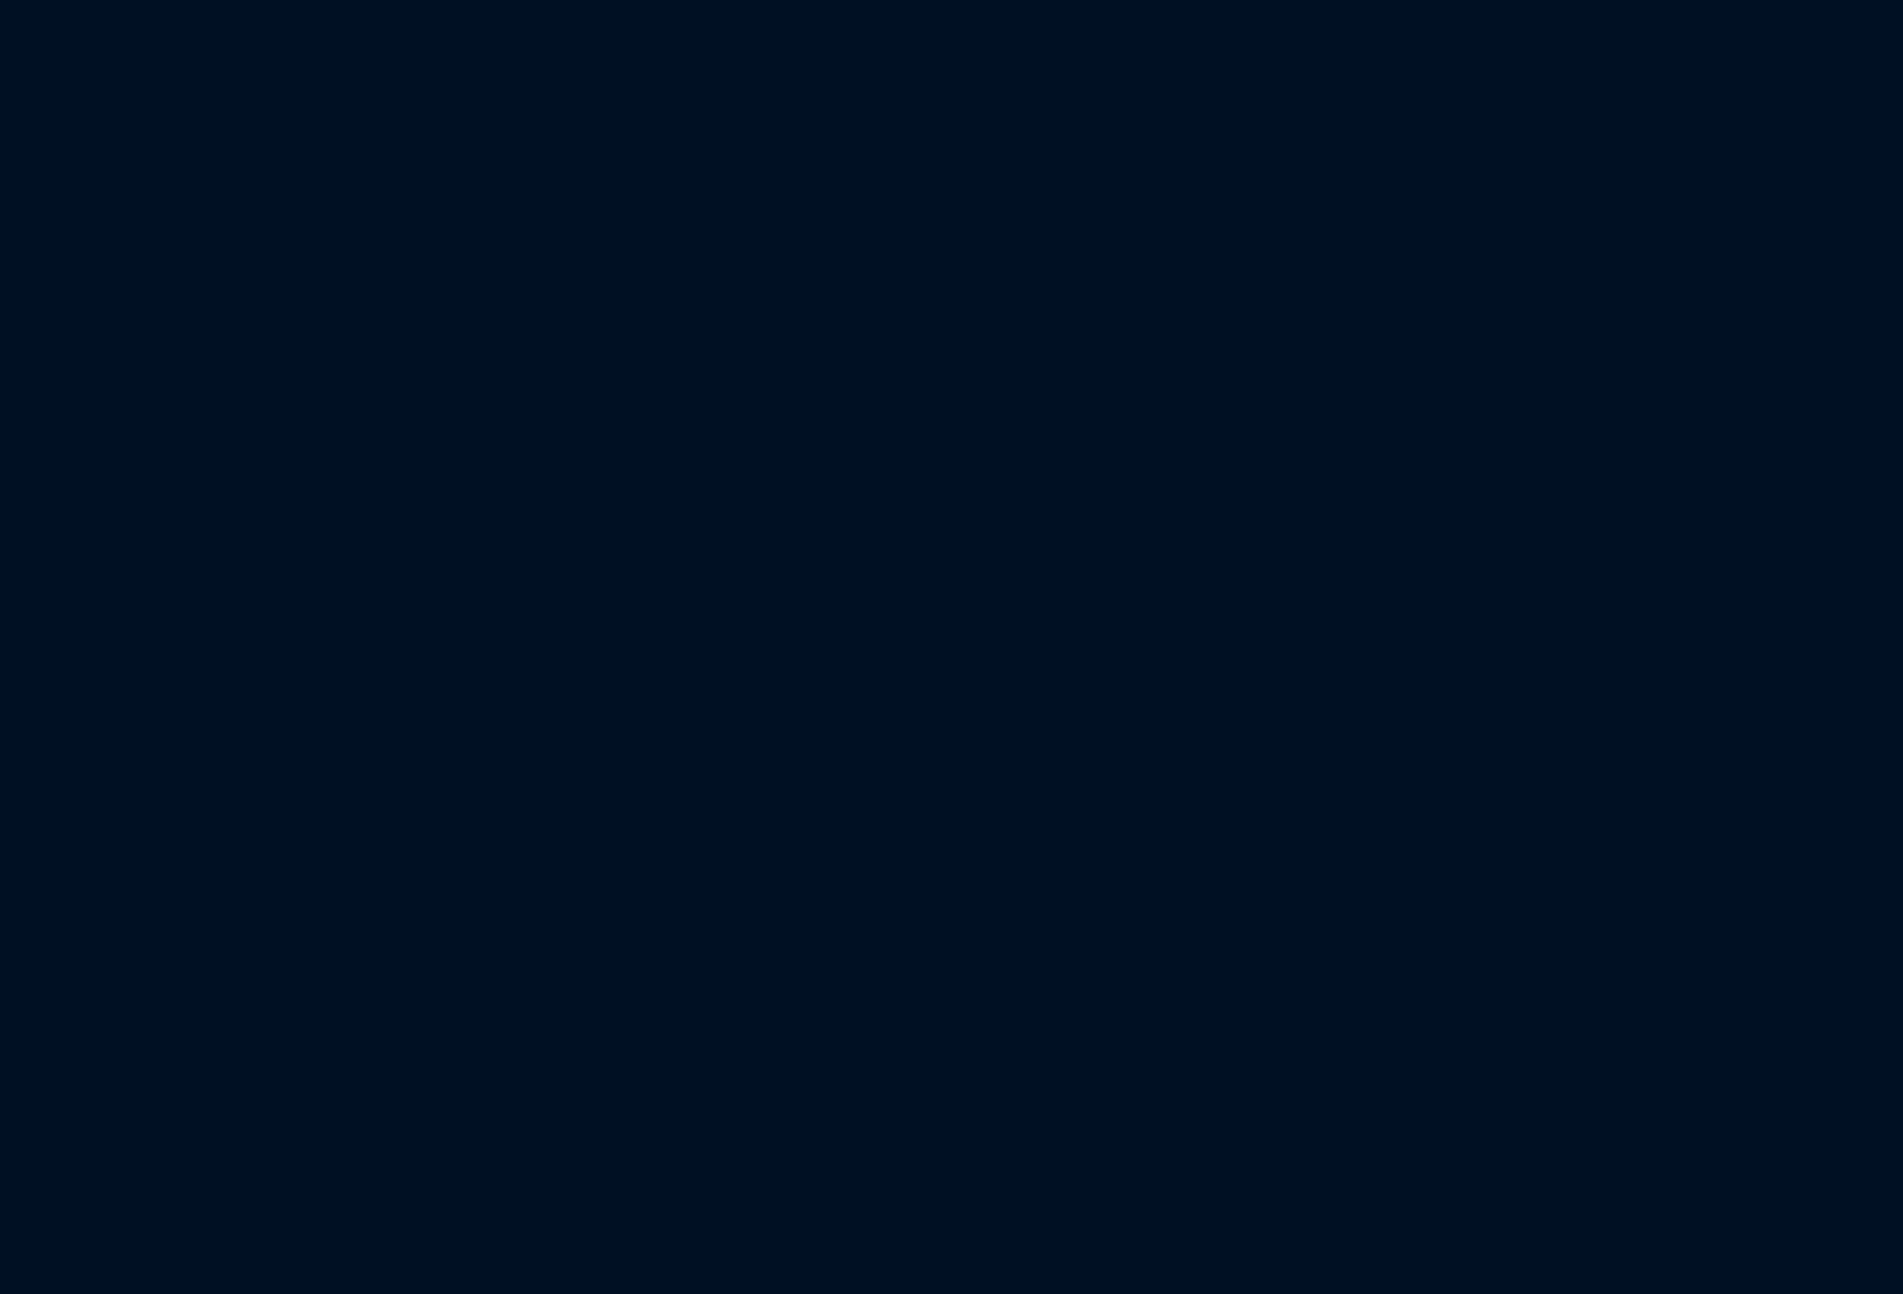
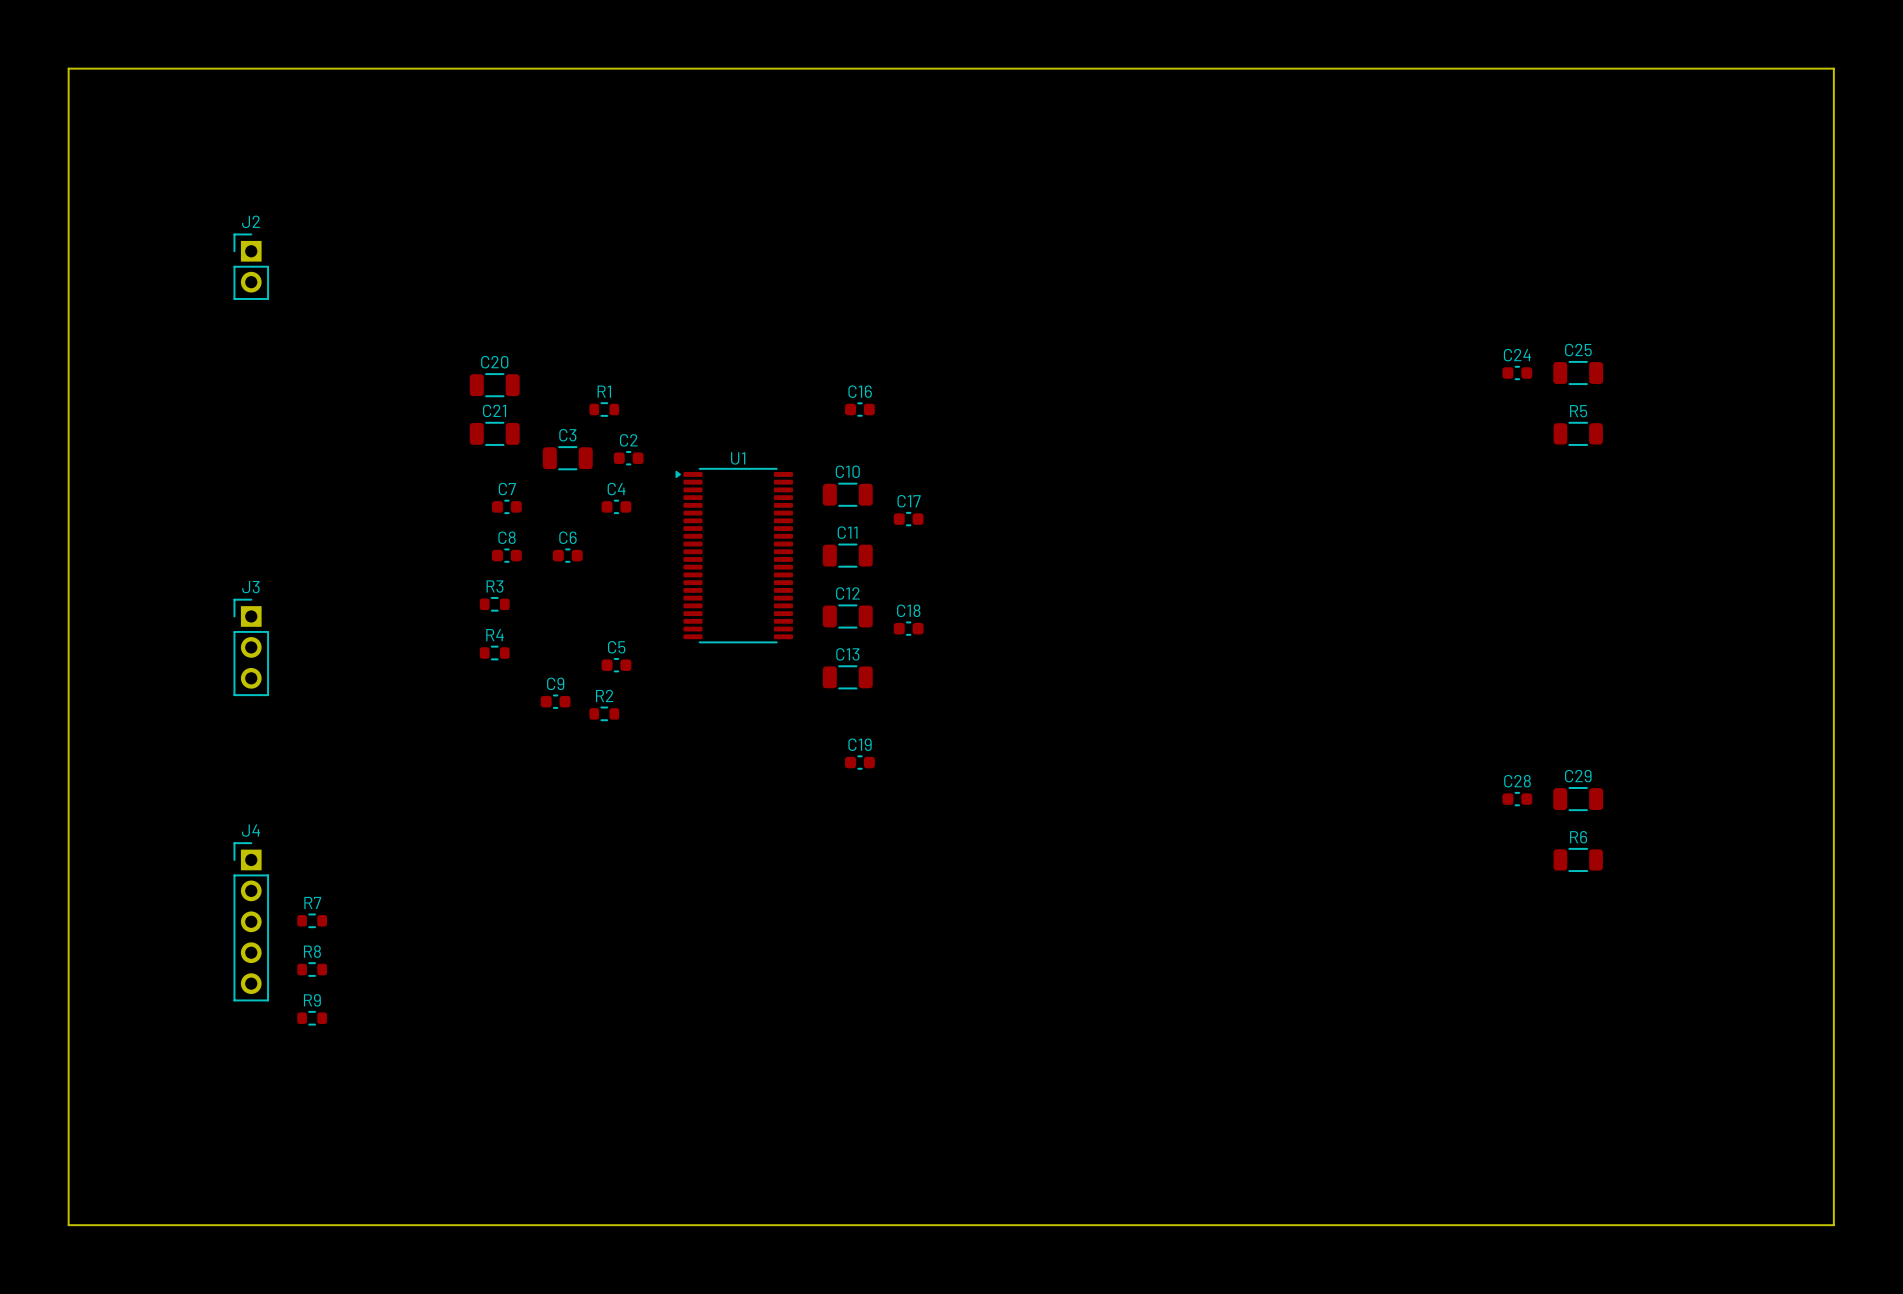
board edge: none -> (68, 68) (1833, 68) (1833, 1225) (68, 1225) (68, 68)
J2: none -> (251, 266)
C24: none -> (1517, 372)
C25: none -> (1578, 372)
C20: none -> (494, 385)
R1: none -> (604, 409)
C16: none -> (859, 409)
C21: none -> (494, 433)
R5: none -> (1578, 433)
C3: none -> (567, 458)
C2: none -> (628, 458)
C10: none -> (847, 494)
C7: none -> (506, 506)
C4: none -> (616, 506)
C17: none -> (908, 519)
C8: none -> (506, 555)
C6: none -> (567, 555)
U1: none -> (734, 555)
C11: none -> (847, 555)
R3: none -> (494, 604)
C12: none -> (847, 616)
C18: none -> (908, 628)
J3: none -> (251, 647)
R4: none -> (494, 653)
C5: none -> (616, 665)
C13: none -> (847, 677)
C9: none -> (555, 701)
R2: none -> (604, 713)
C19: none -> (859, 762)
C28: none -> (1517, 799)
C29: none -> (1578, 799)
R6: none -> (1578, 859)
R7: none -> (312, 920)
J4: none -> (251, 921)
R8: none -> (312, 969)
R9: none -> (312, 1018)

